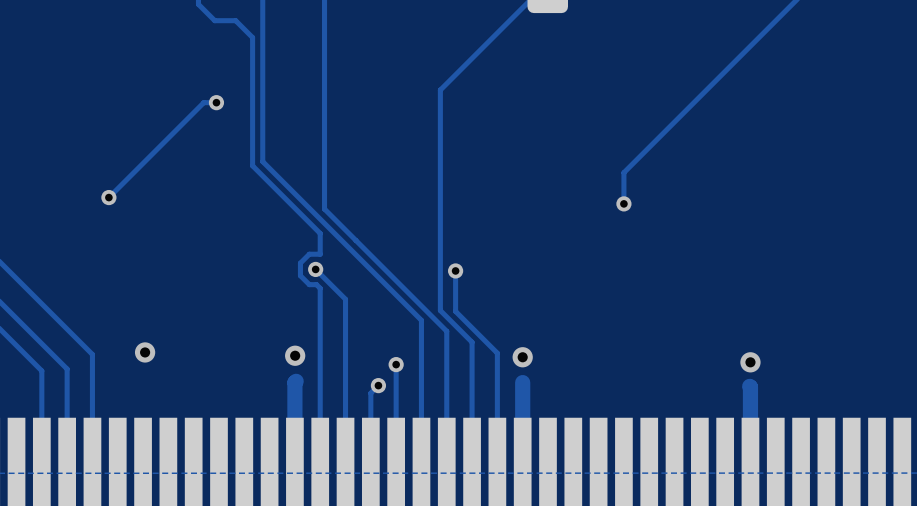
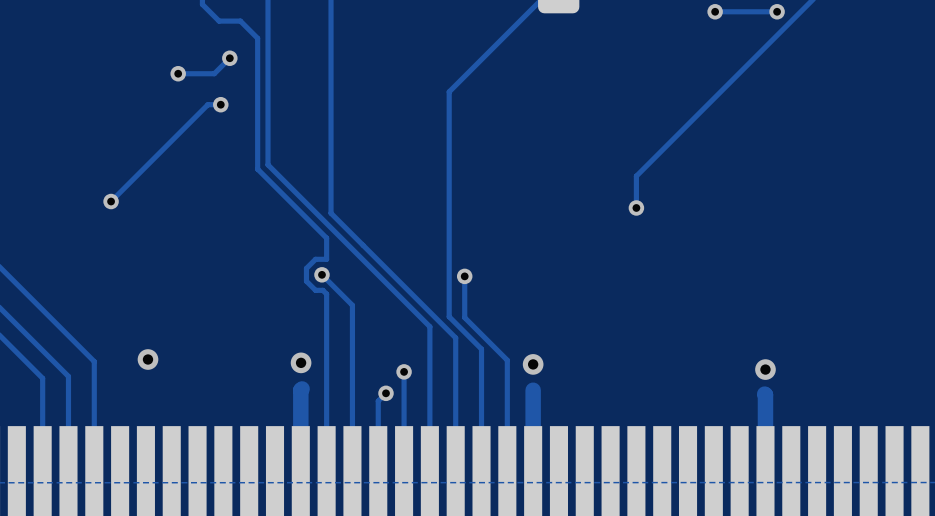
via: none -> (715, 11)
track: none -> (777, 11) (715, 11)
via: none -> (777, 11)
track: none -> (229, 58) (214, 73) (178, 73)
via: none -> (229, 58)
via: none -> (178, 73)

